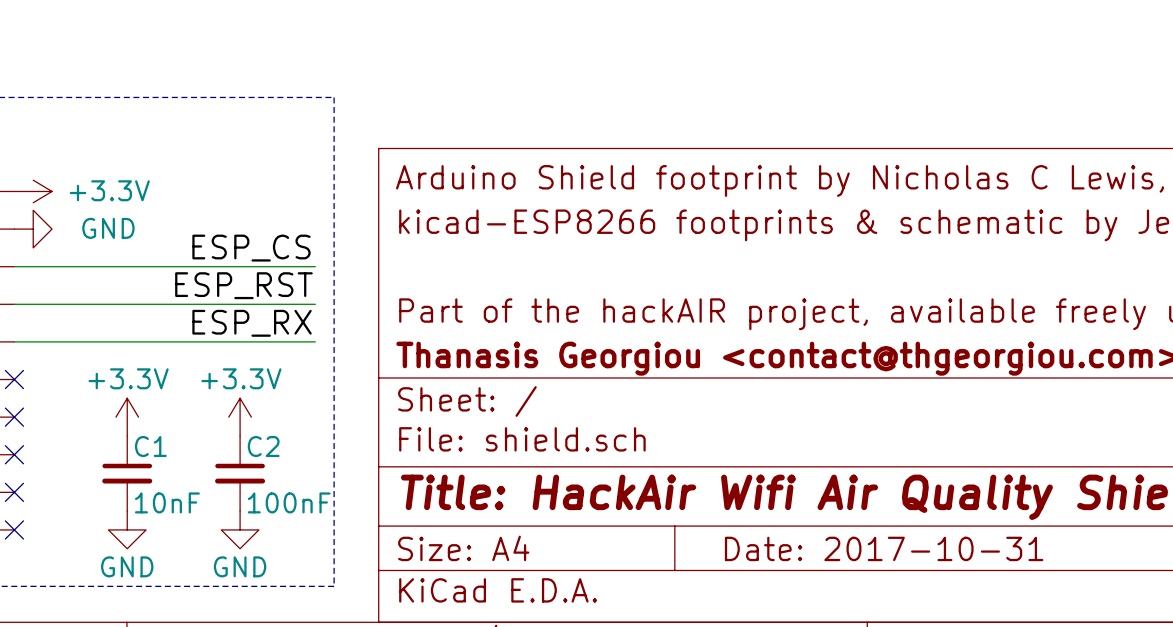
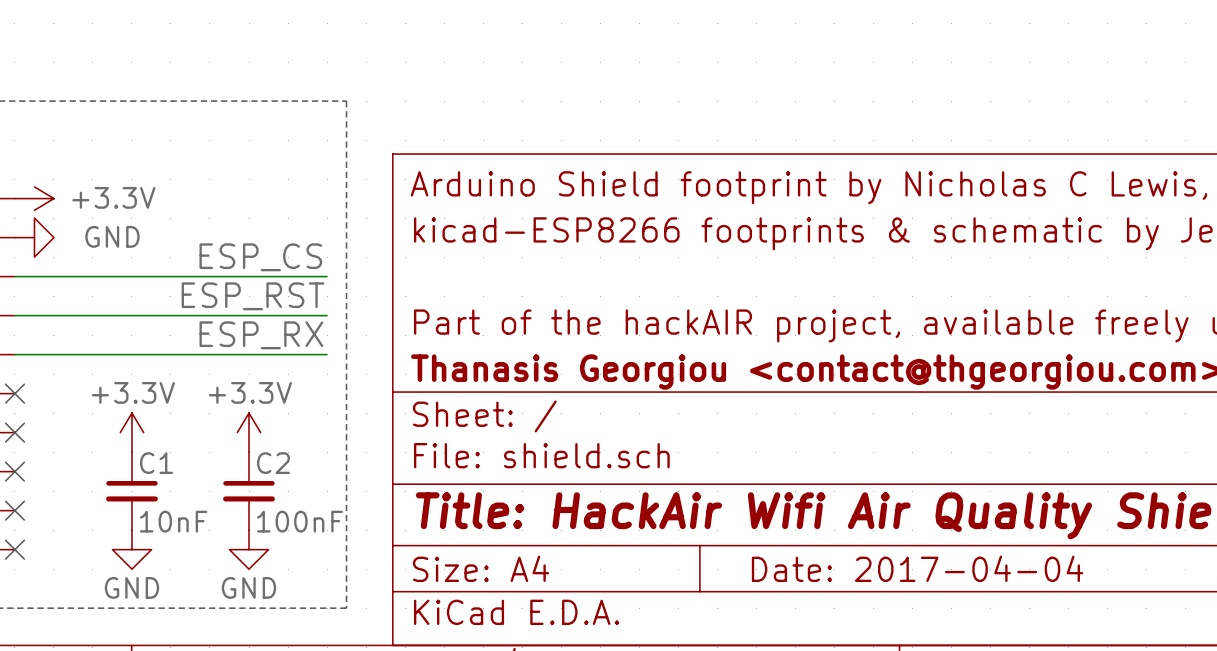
title block: Date: 2017-10-31 (884, 548) -> Date: 2017-04-04 (917, 568)

